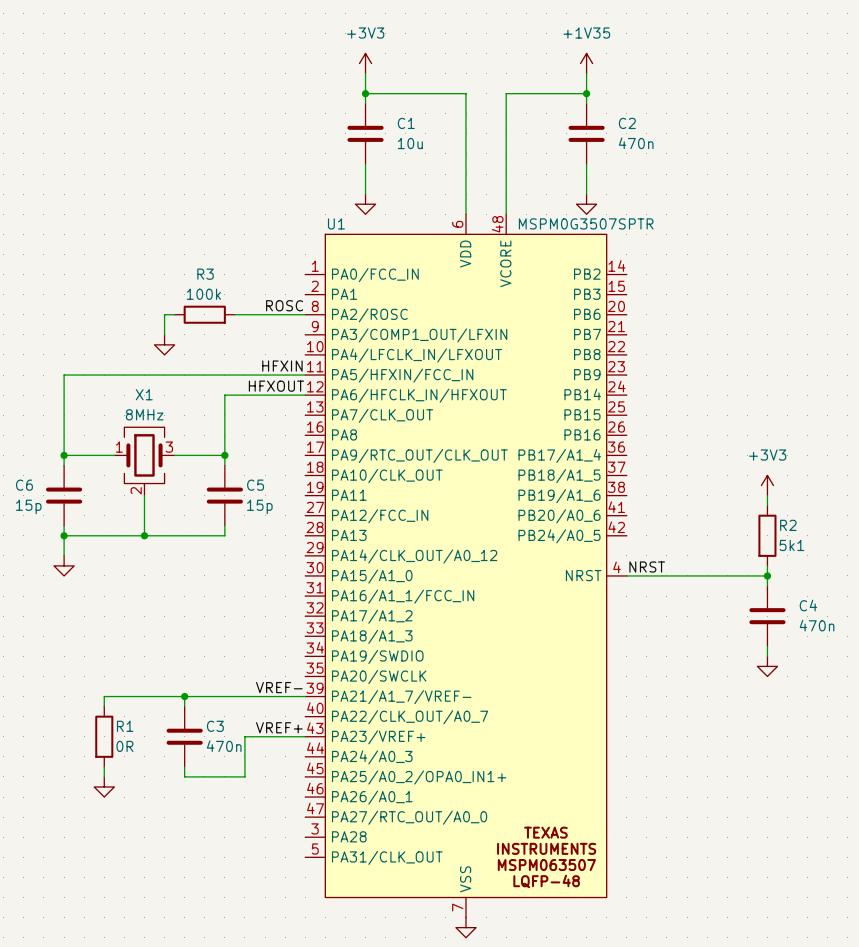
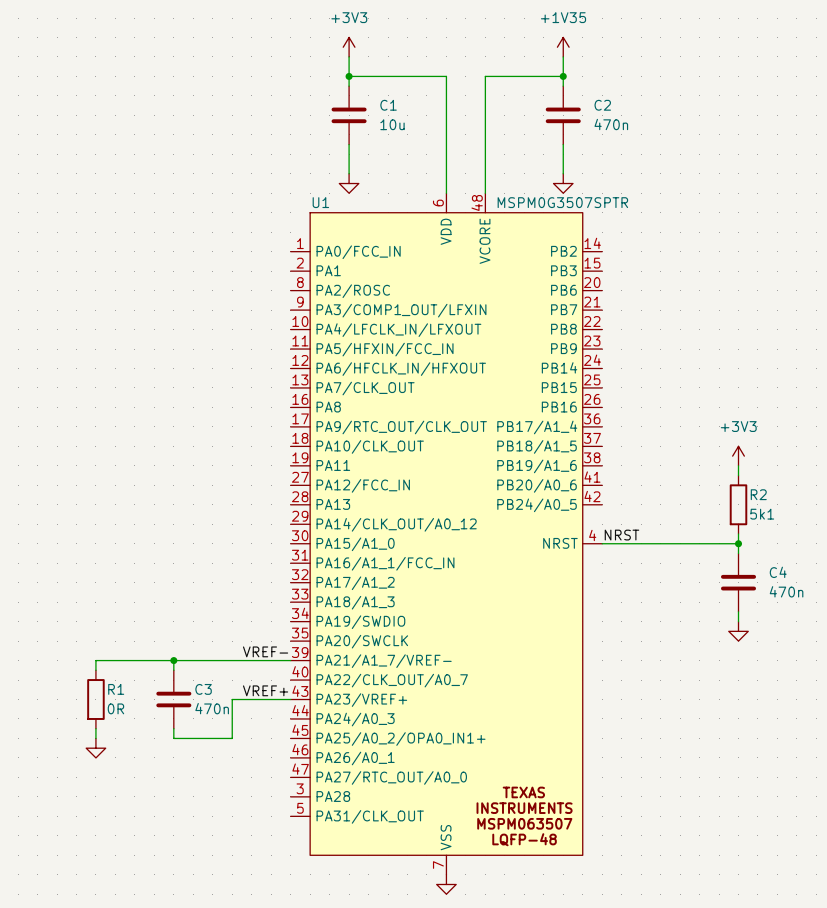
label: ROSC (284, 305) -> none
wire: (174, 314) (164, 314) (164, 334) -> none
R3: 100k (204, 314) -> none
wire: (234, 314) (305, 314) -> none
power symbol: (164, 344) -> none
label: HFXIN (282, 366) -> none
wire: (305, 375) (64, 375) (64, 465) -> none
label: HFXOUT (276, 386) -> none
wire: (305, 395) (224, 395) (224, 465) -> none
wire: (64, 455) (114, 455) -> none
junction: (64, 455) -> none
wire: (174, 455) (224, 455) -> none
junction: (224, 455) -> none
X1: 8MHz (144, 461) -> none
C6: 15p (64, 495) -> none
wire: (144, 495) (144, 535) -> none
C5: 15p (224, 495) -> none
wire: (64, 525) (64, 555) -> none
wire: (224, 525) (224, 535) (64, 535) -> none
junction: (64, 535) -> none
junction: (144, 535) -> none
power symbol: (64, 565) -> none

